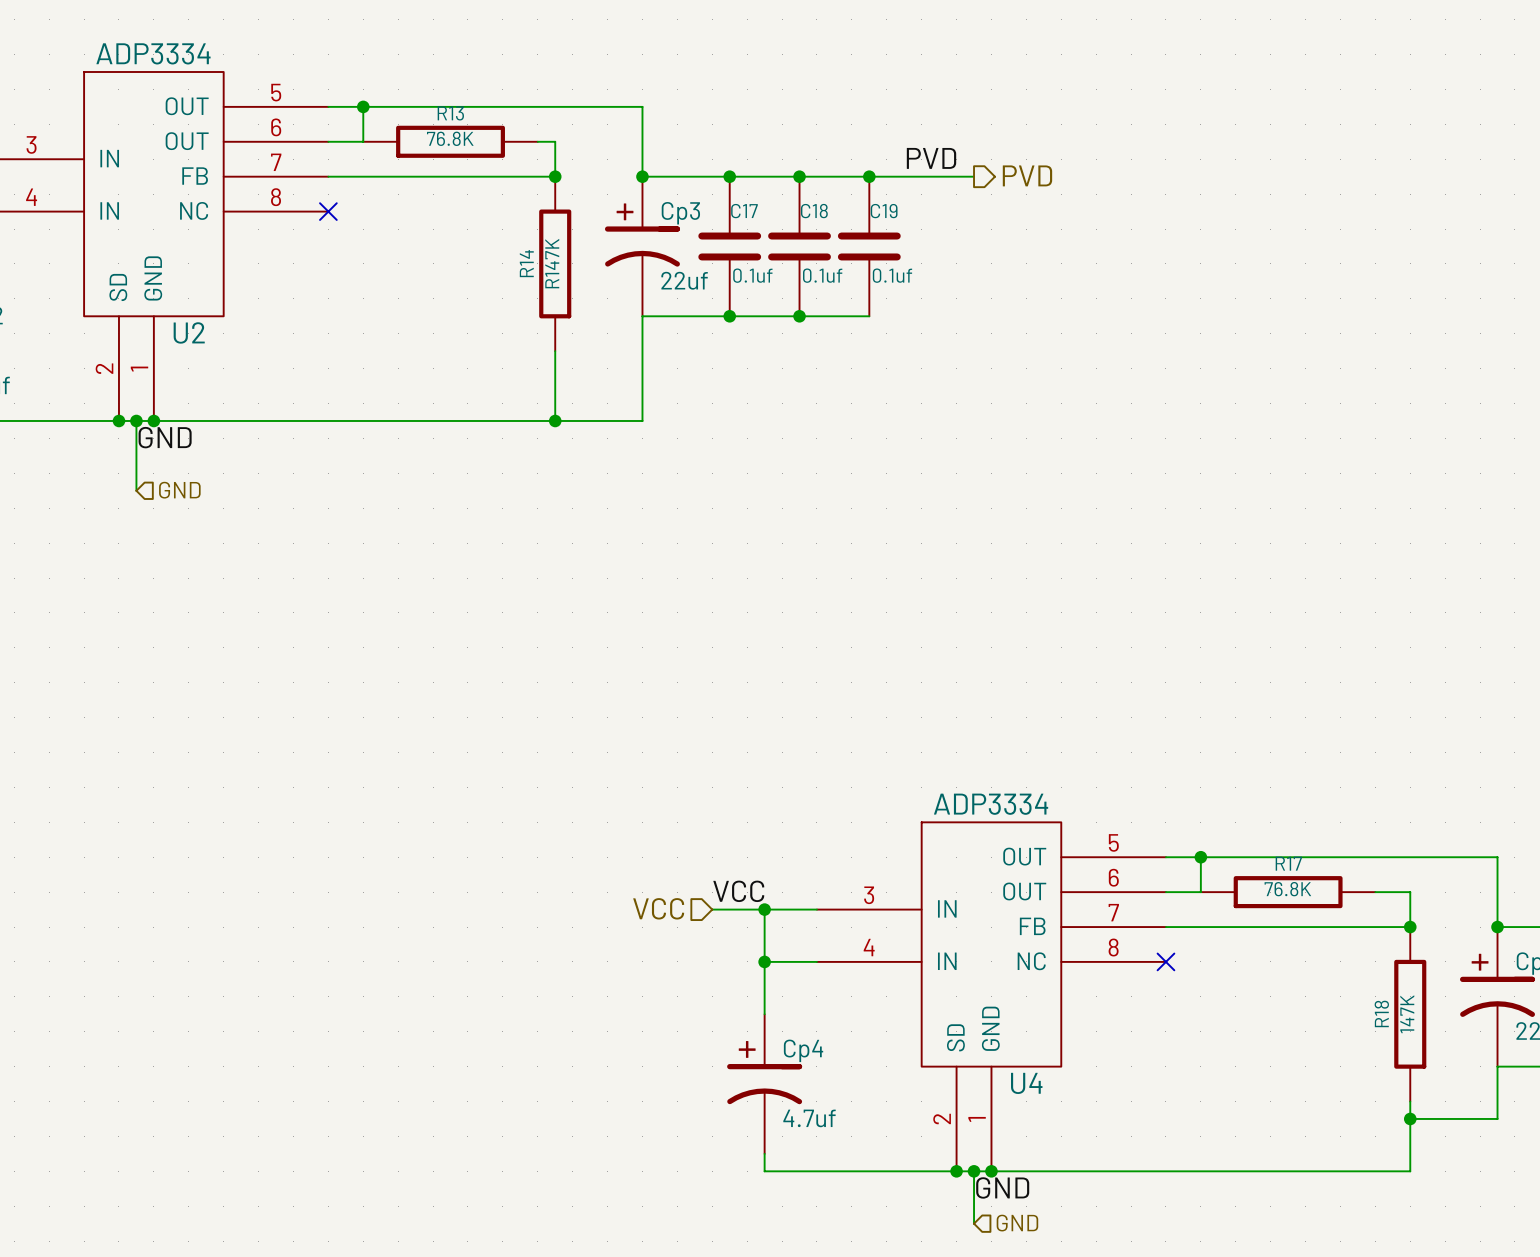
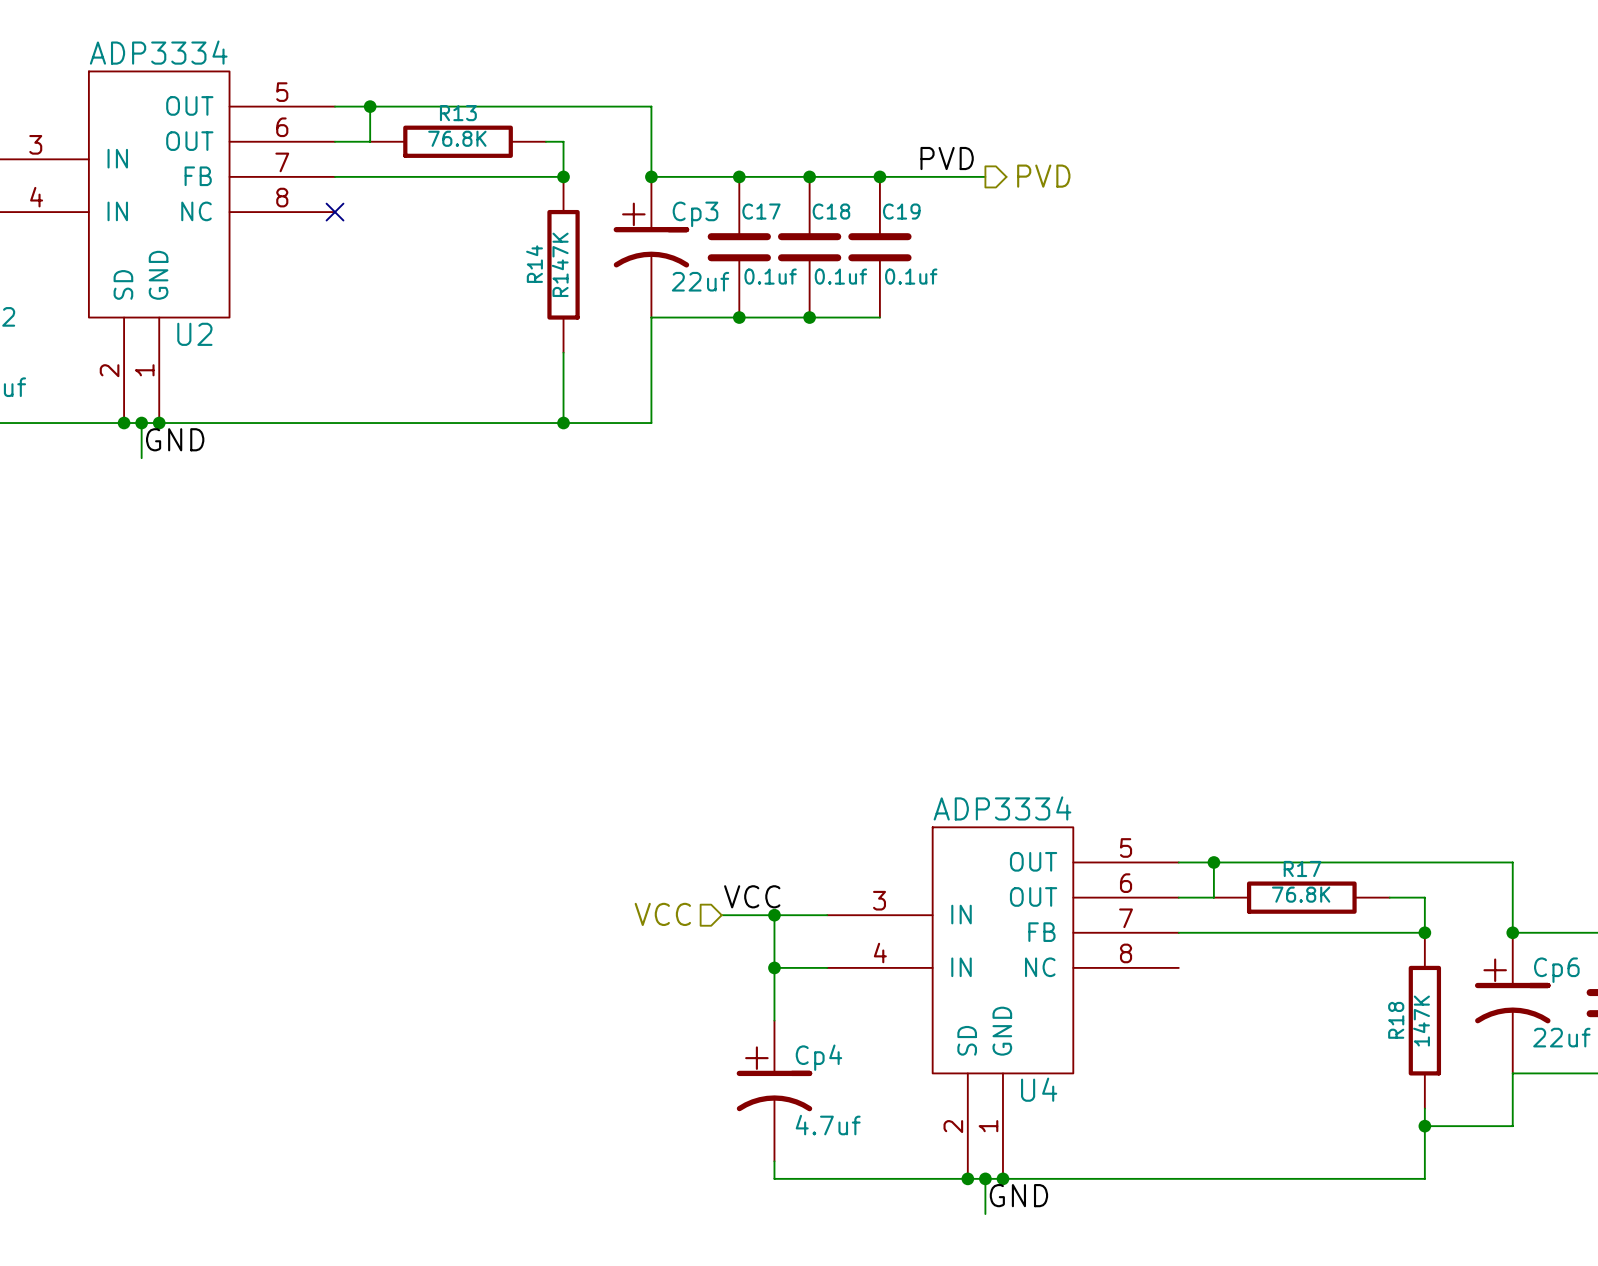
wire: (136, 455) (136, 490) -> none
hierarchical label: GND (179, 490) -> none
no-connect mark: (1165, 961) -> none
wire: (974, 1206) (974, 1223) -> none
hierarchical label: GND (1017, 1223) -> none

